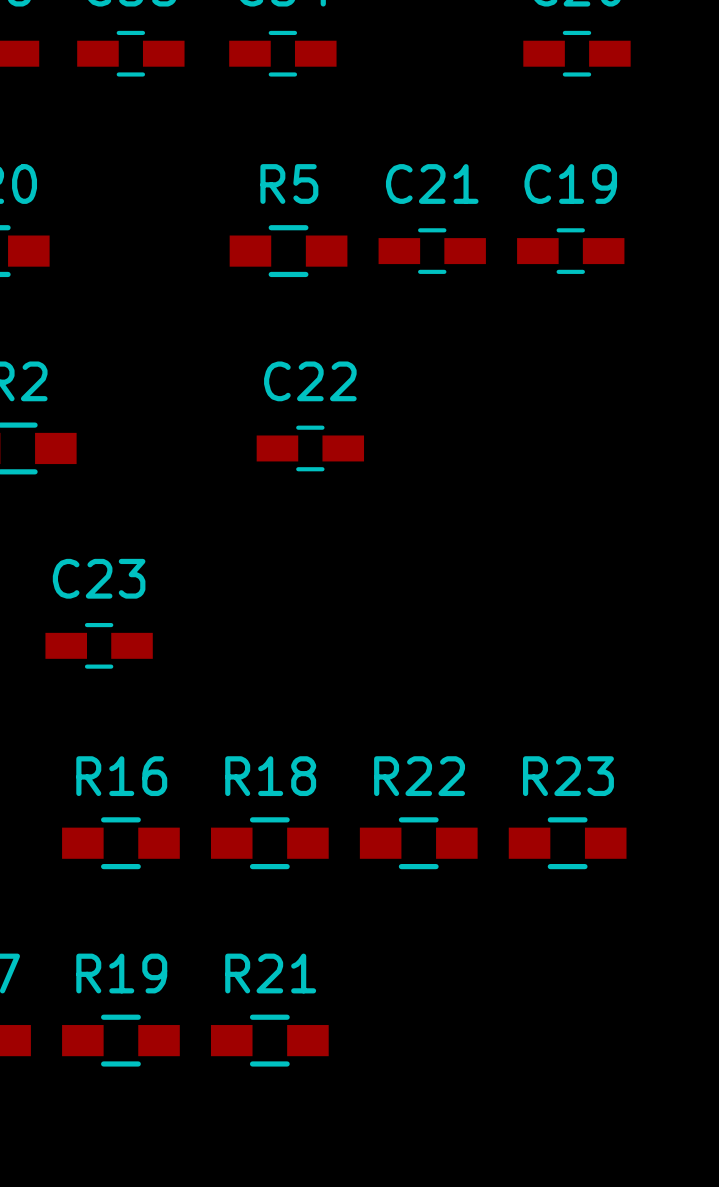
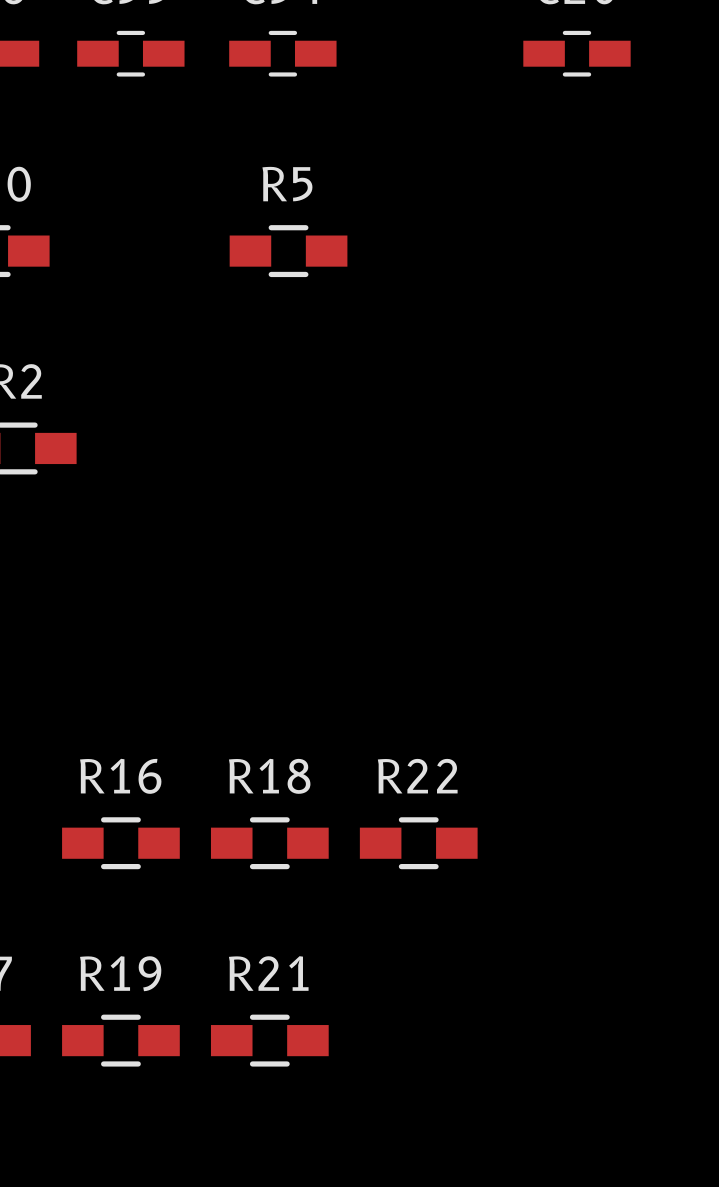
C21: (432, 251) -> none
C19: (570, 251) -> none
C22: (310, 448) -> none
C23: (99, 645) -> none
R23: (567, 843) -> none

